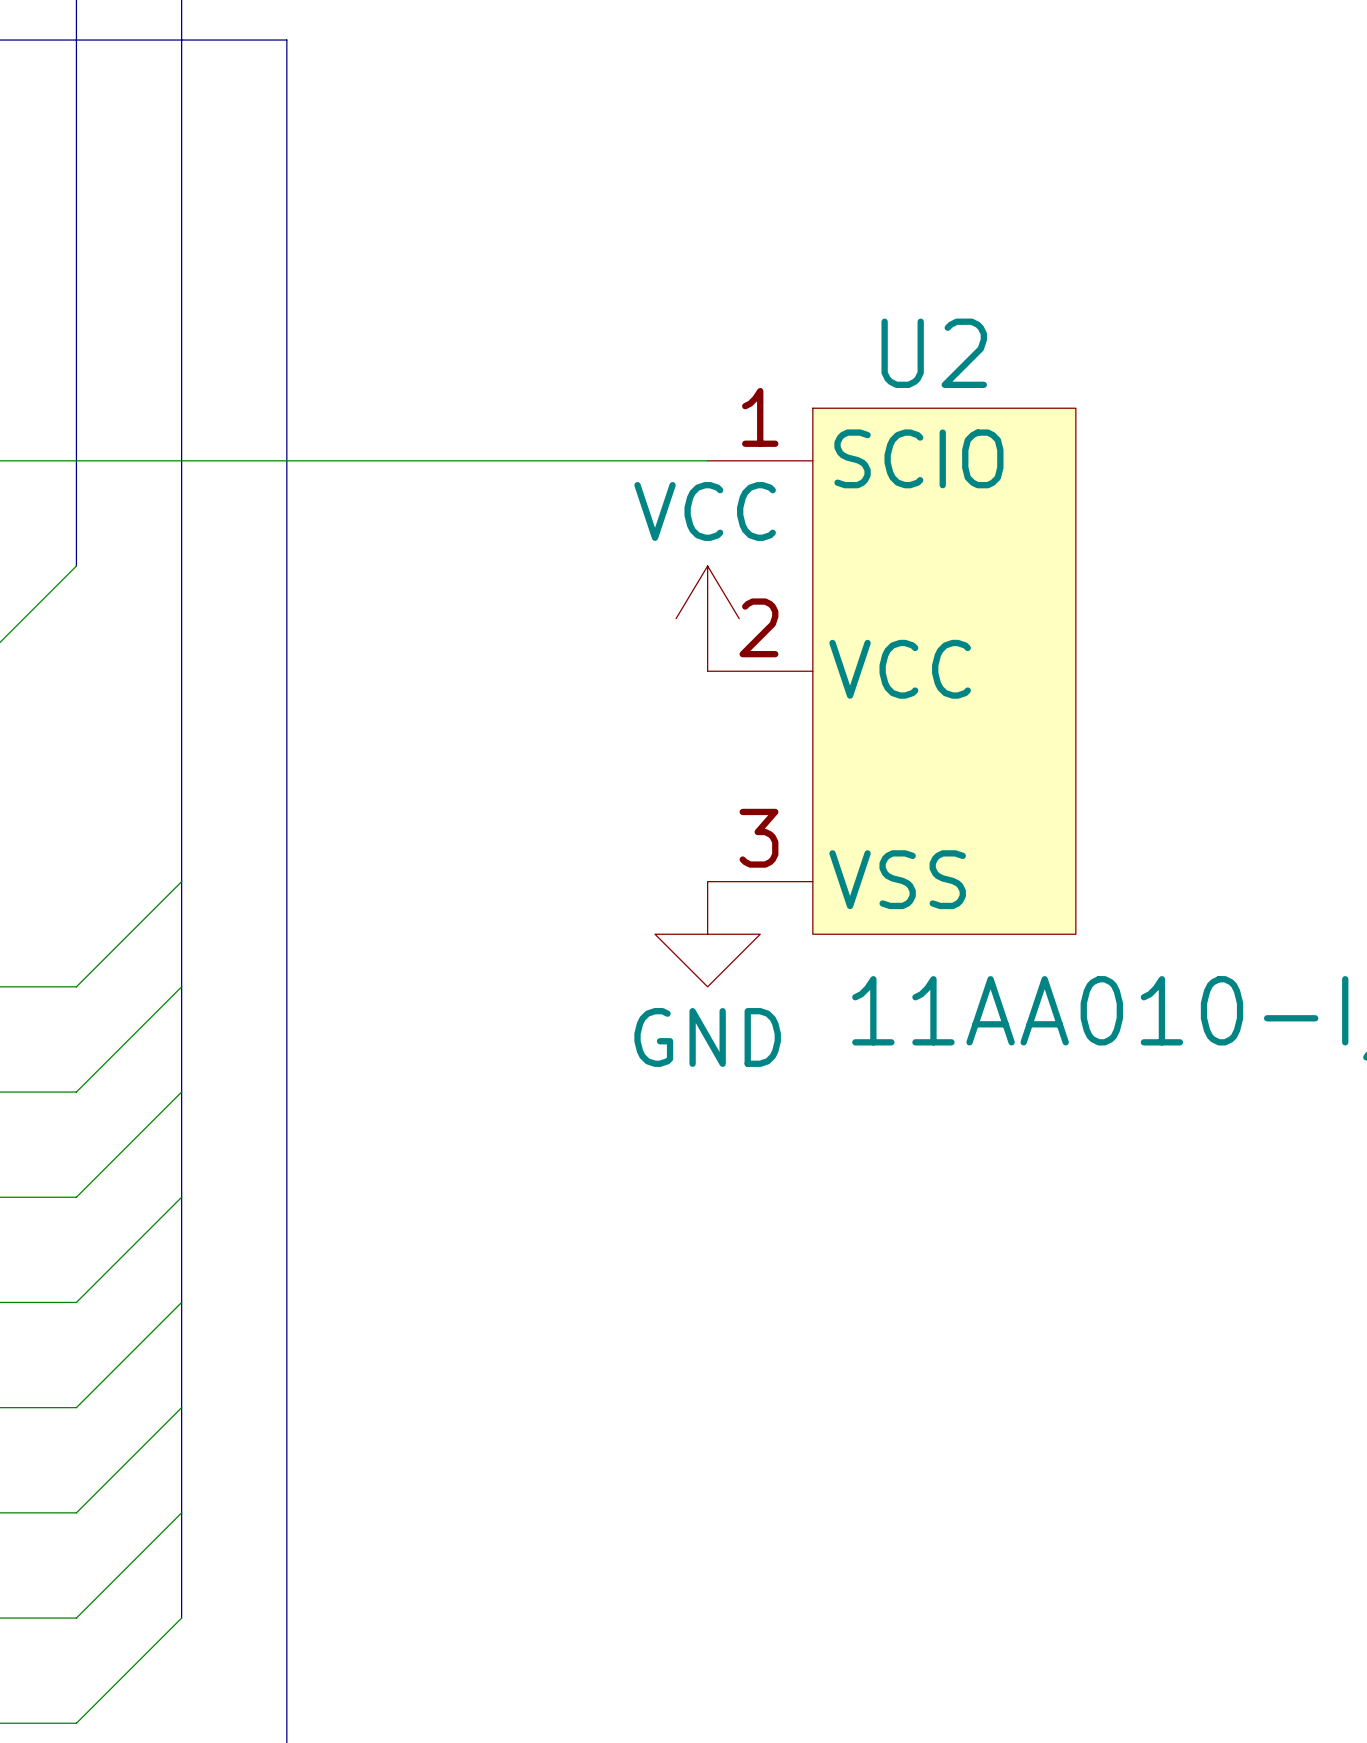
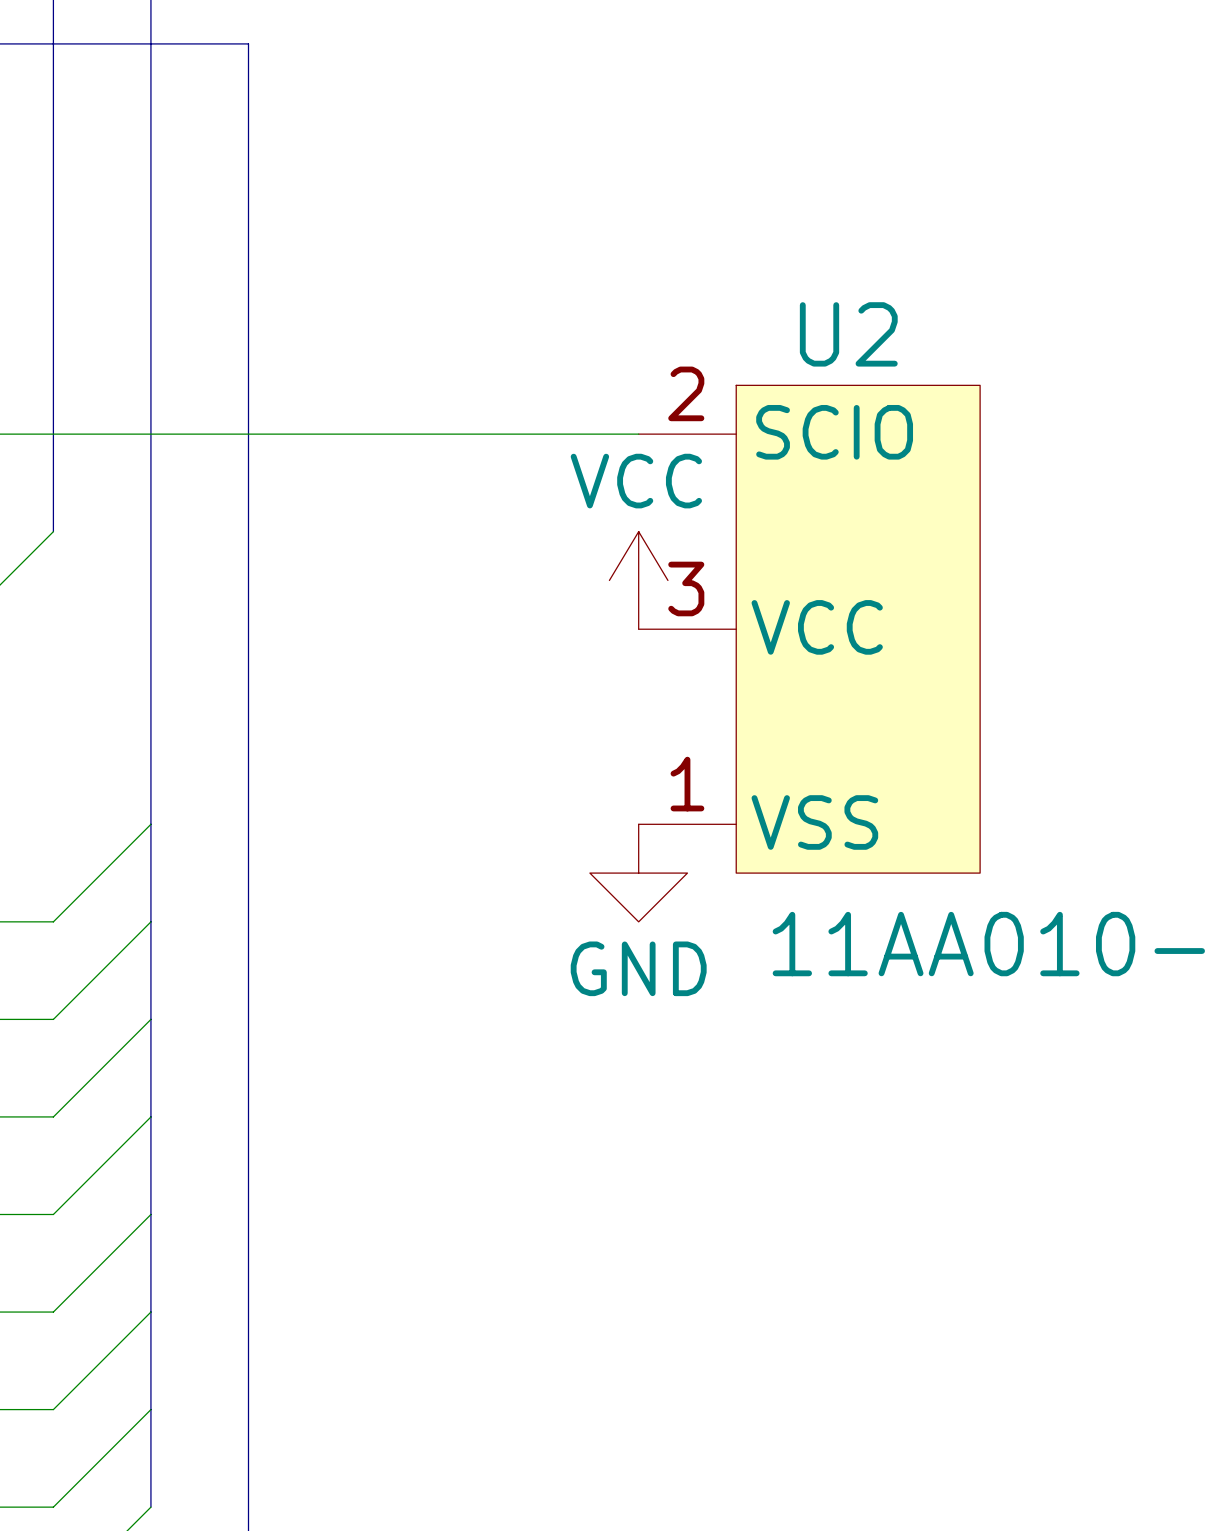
U2 pin number: 1 (760, 417) -> 2 (686, 393)
U2 pin number: 2 (758, 627) -> 3 (686, 588)
U2 pin number: 3 (758, 838) -> 1 (687, 784)

